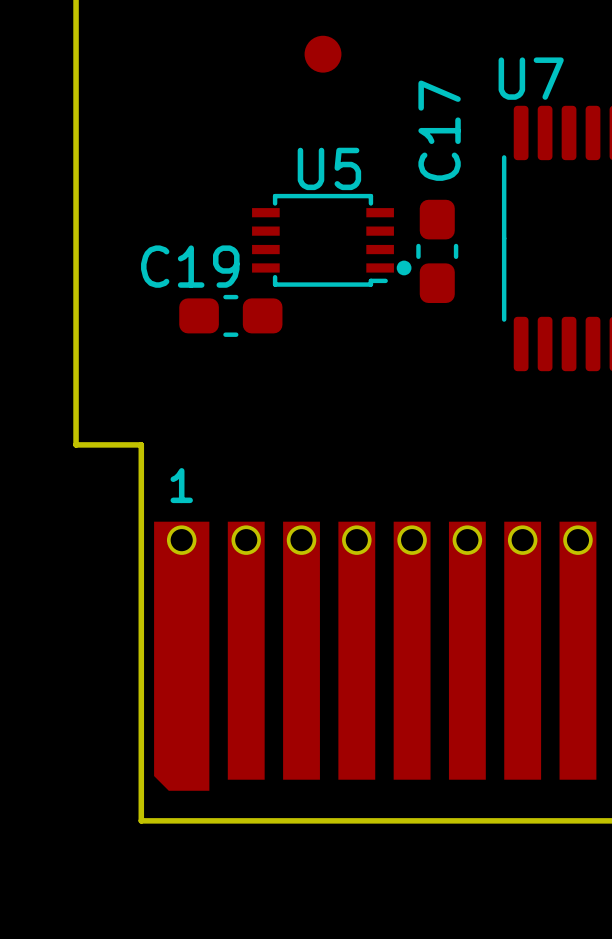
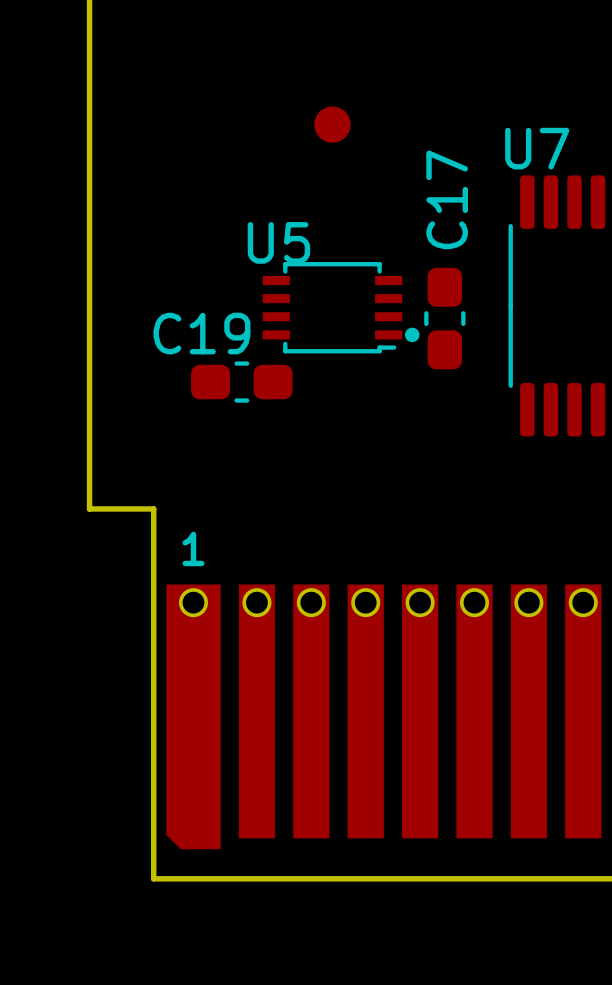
U5 name position: U5 (329, 168) -> U5 (278, 242)

